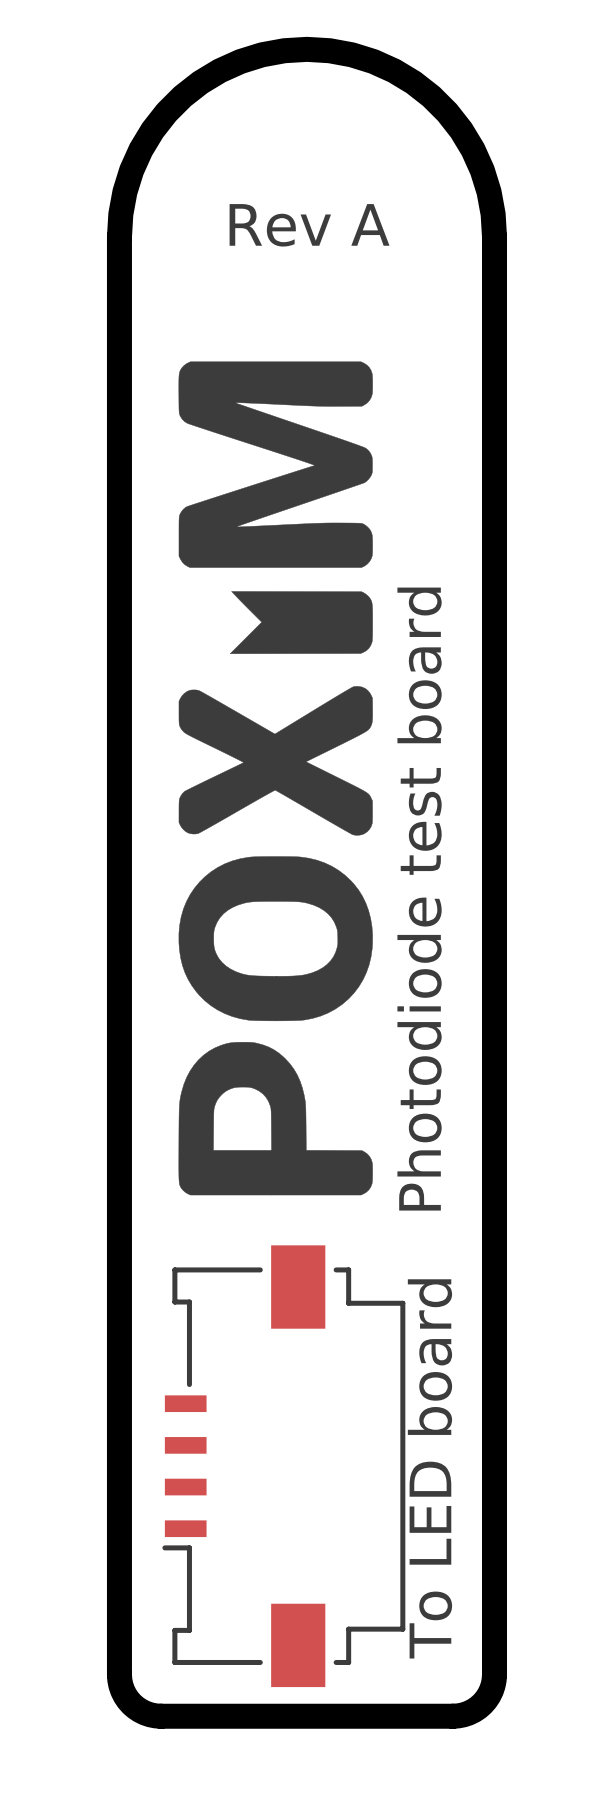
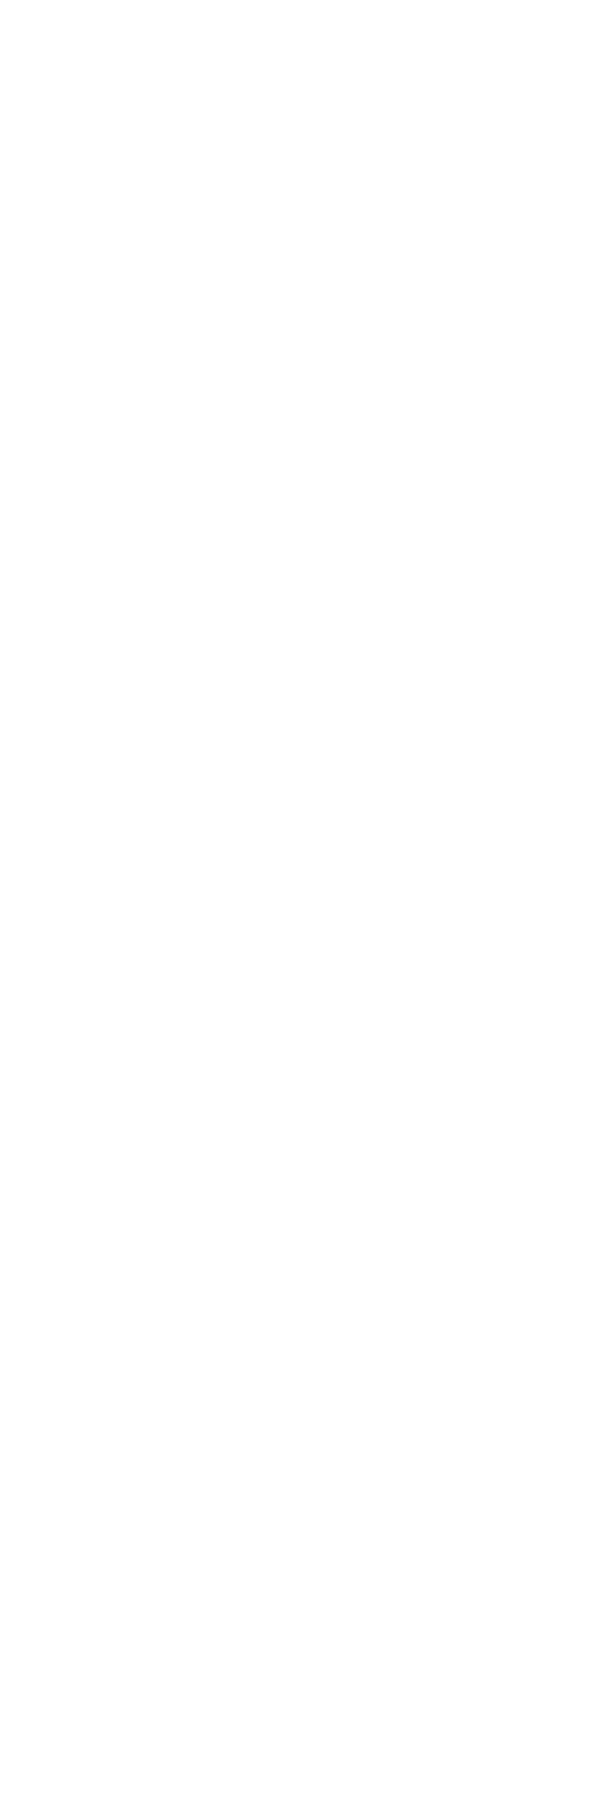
text: Rev A (309, 225) -> none
board edge: (119, 236) (120, 1685) (131, 1704) (145, 1713) (155, 1715) (463, 1714) (478, 1707) (485, 1699) (491, 1690) (494, 1674) (494, 236) (489, 192) (482, 170) (461, 130) (431, 96) (413, 82) (373, 61) (351, 54) (306, 49) (284, 50) (262, 54) (219, 70) (182, 96) (166, 112) (140, 149) (131, 170) (120, 214) (119, 236) -> none
drawing: [178, 361, 373, 1196] -> none
text: Photodiode test board (419, 899) -> none
part: (283, 1466) -> none
text: To LED board (429, 1468) -> none

